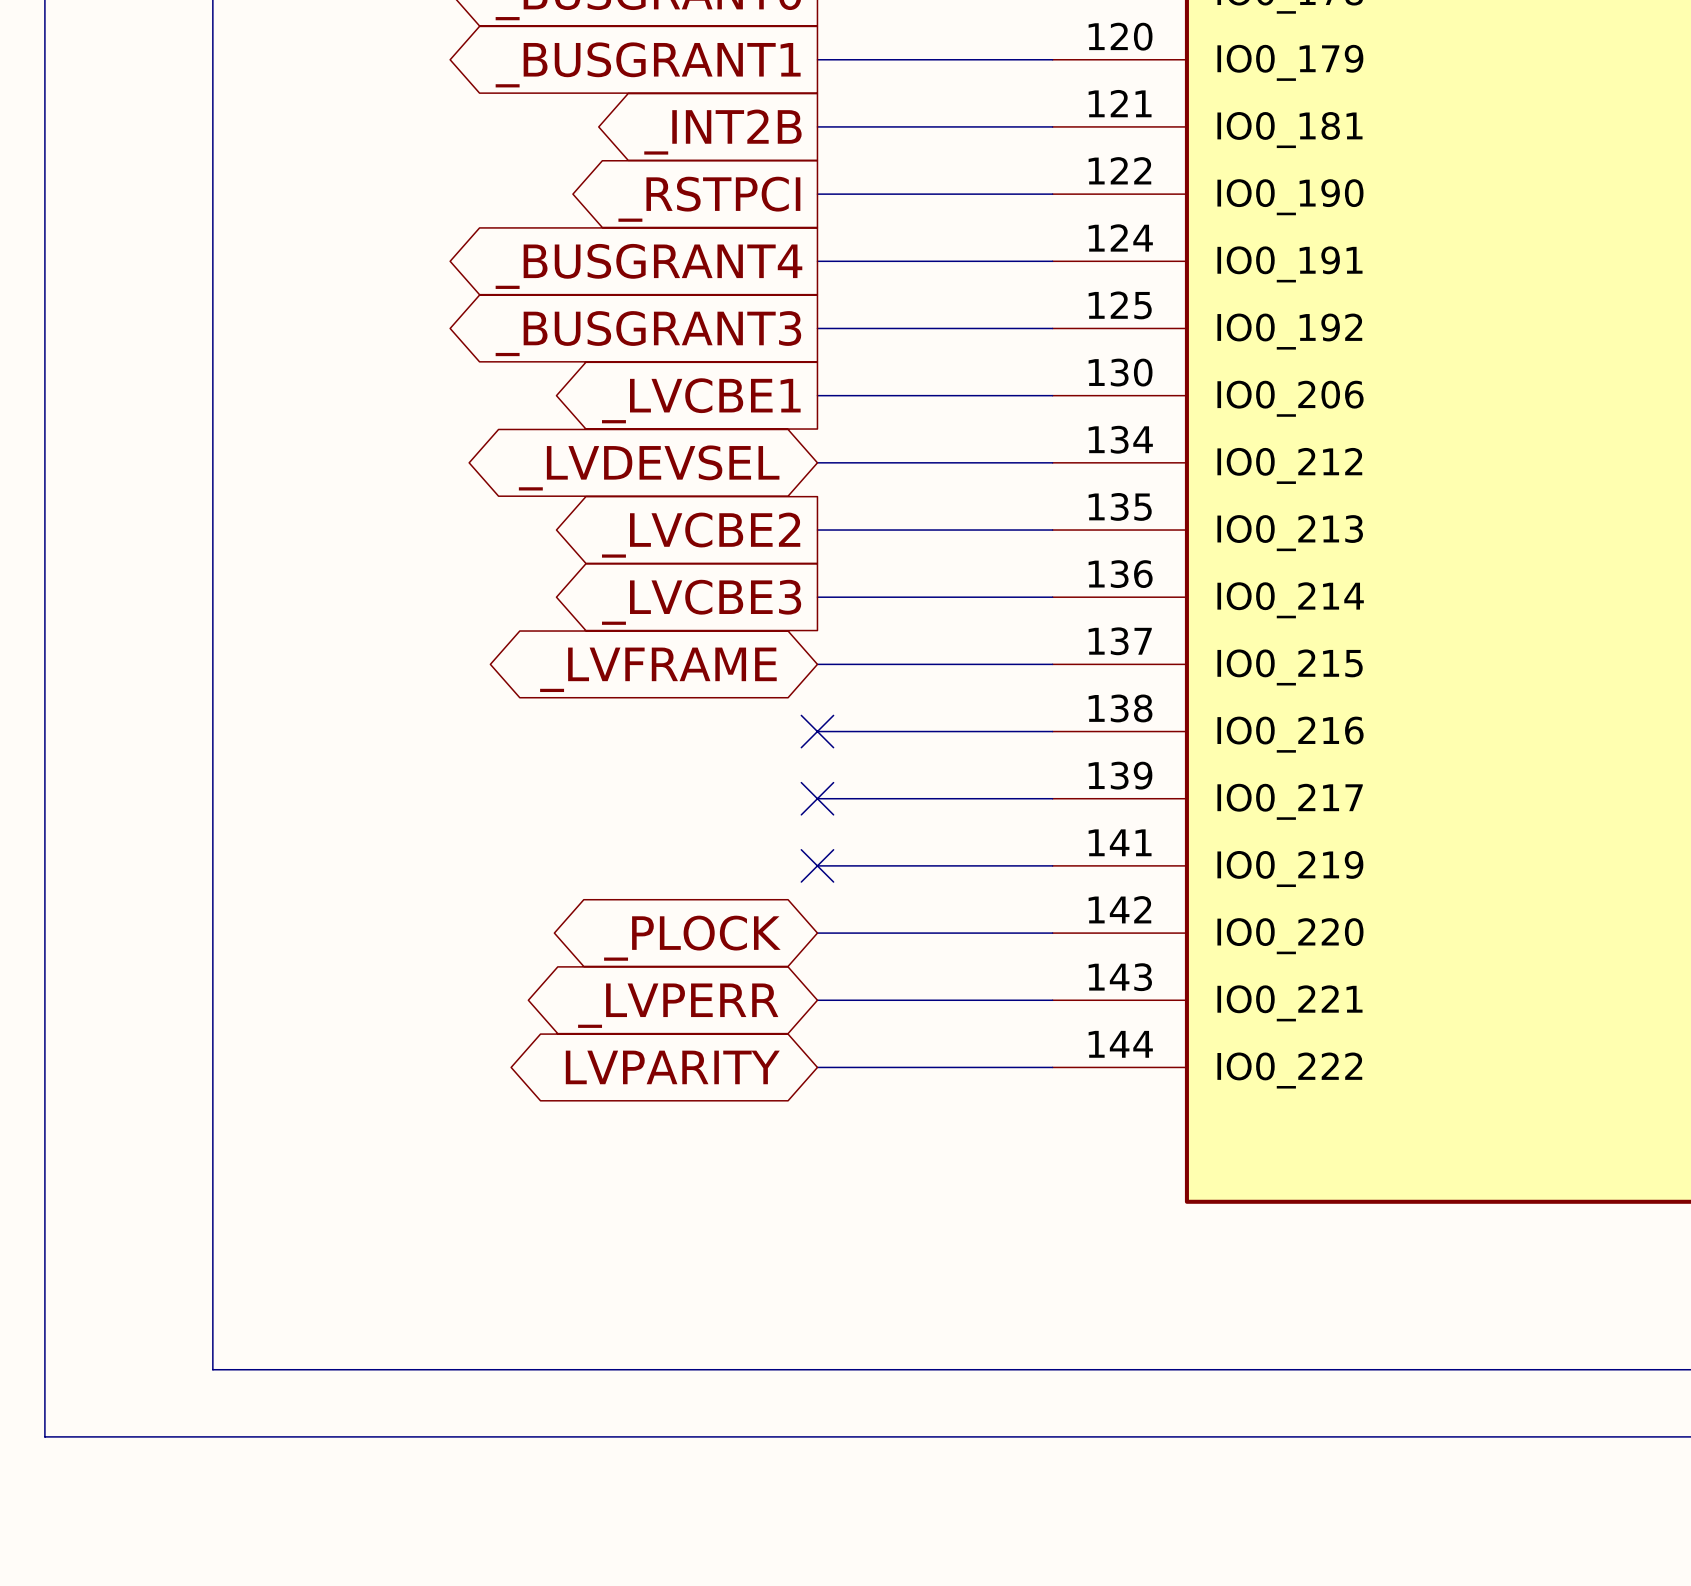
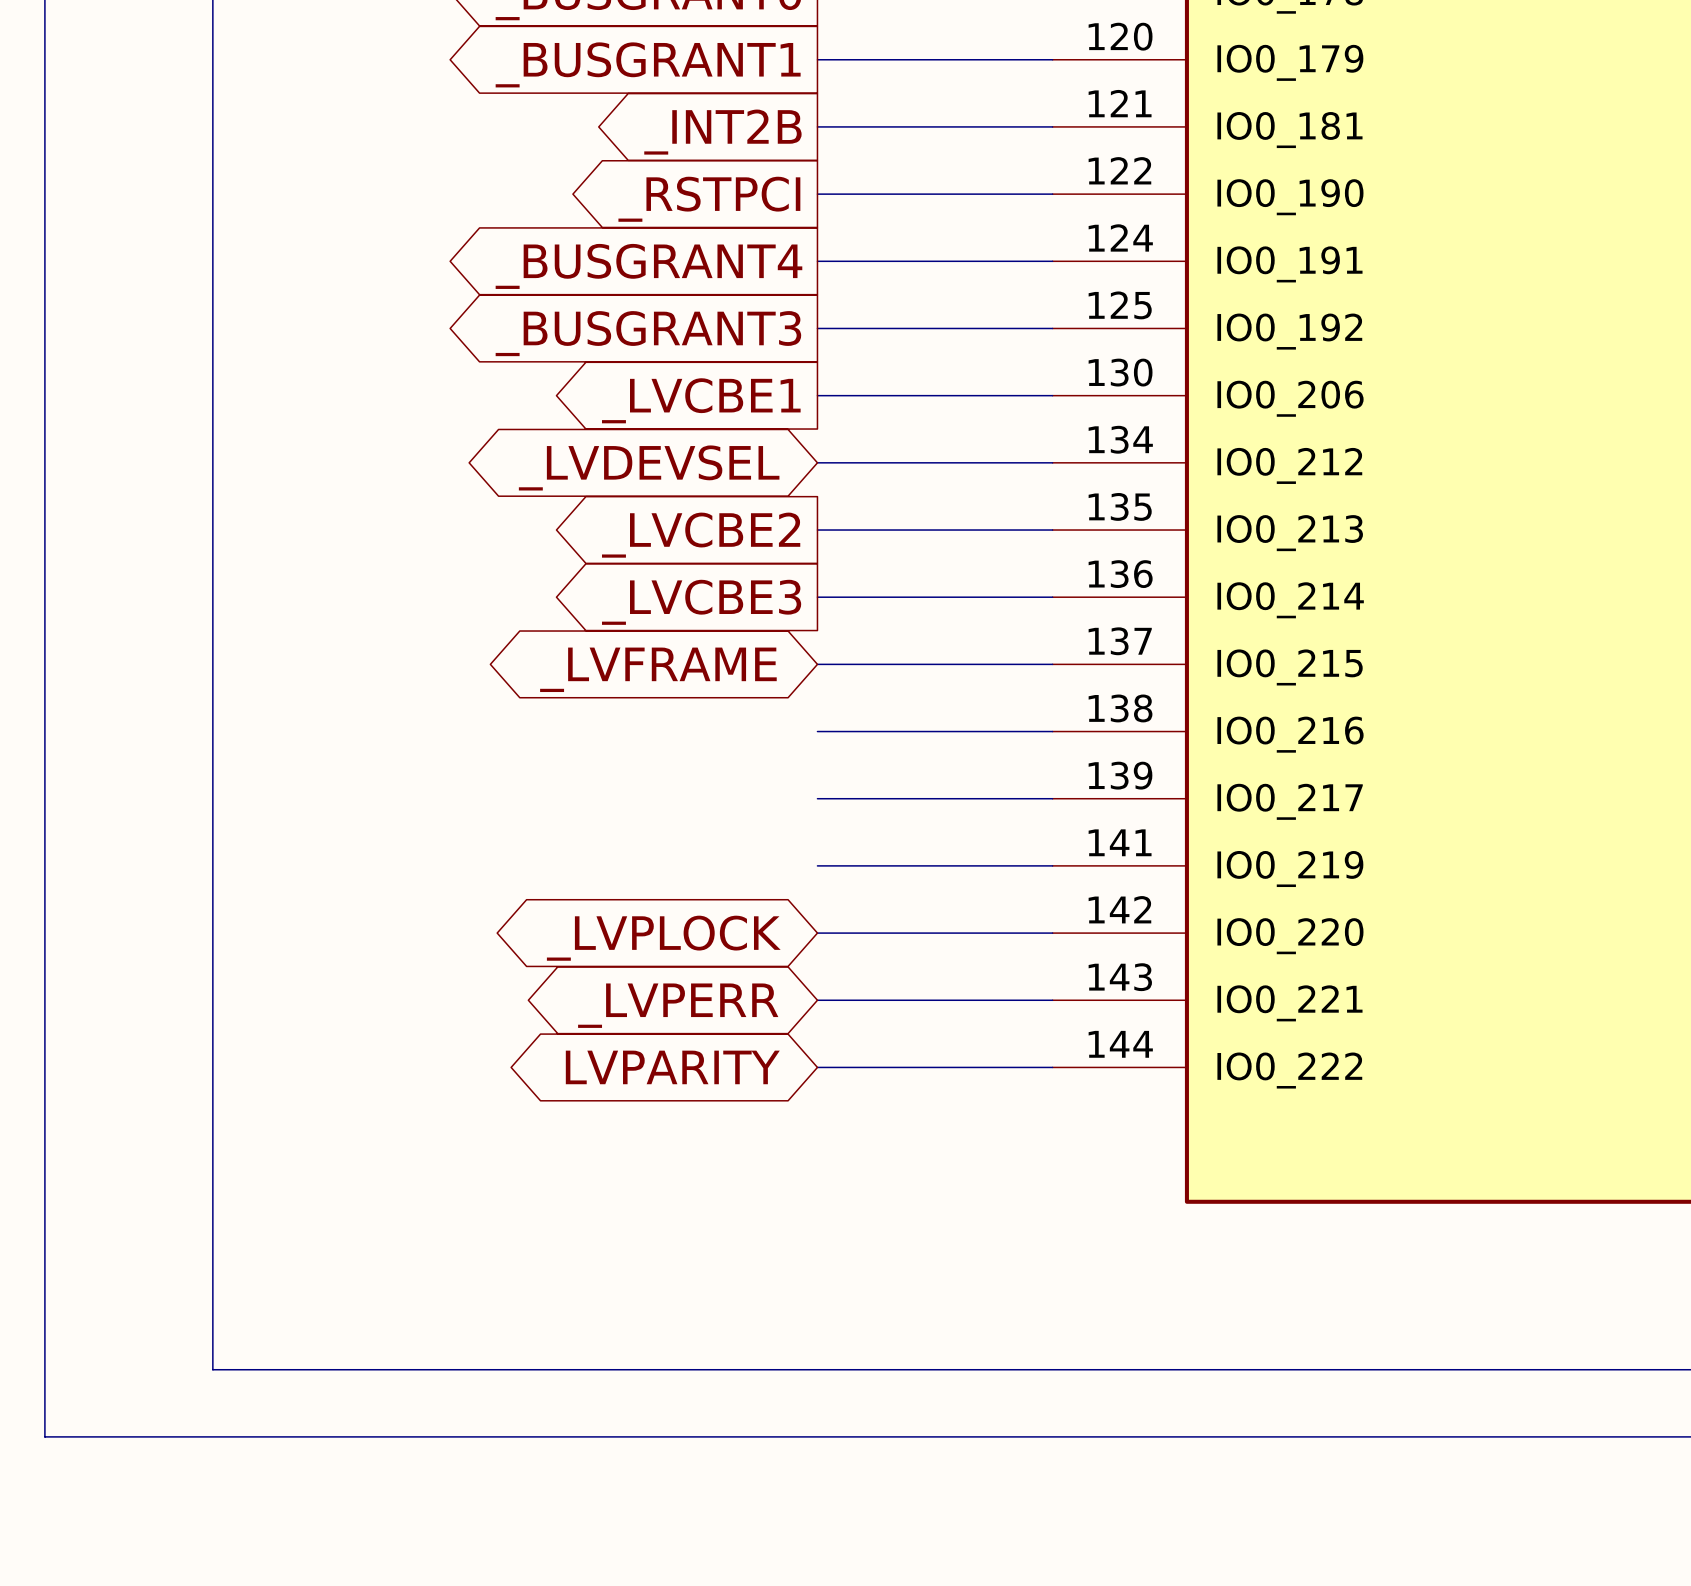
no-connect mark: (817, 731) -> none
no-connect mark: (817, 798) -> none
no-connect mark: (817, 865) -> none
global label: _PLOCK (692, 938) -> _LVPLOCK (663, 938)

